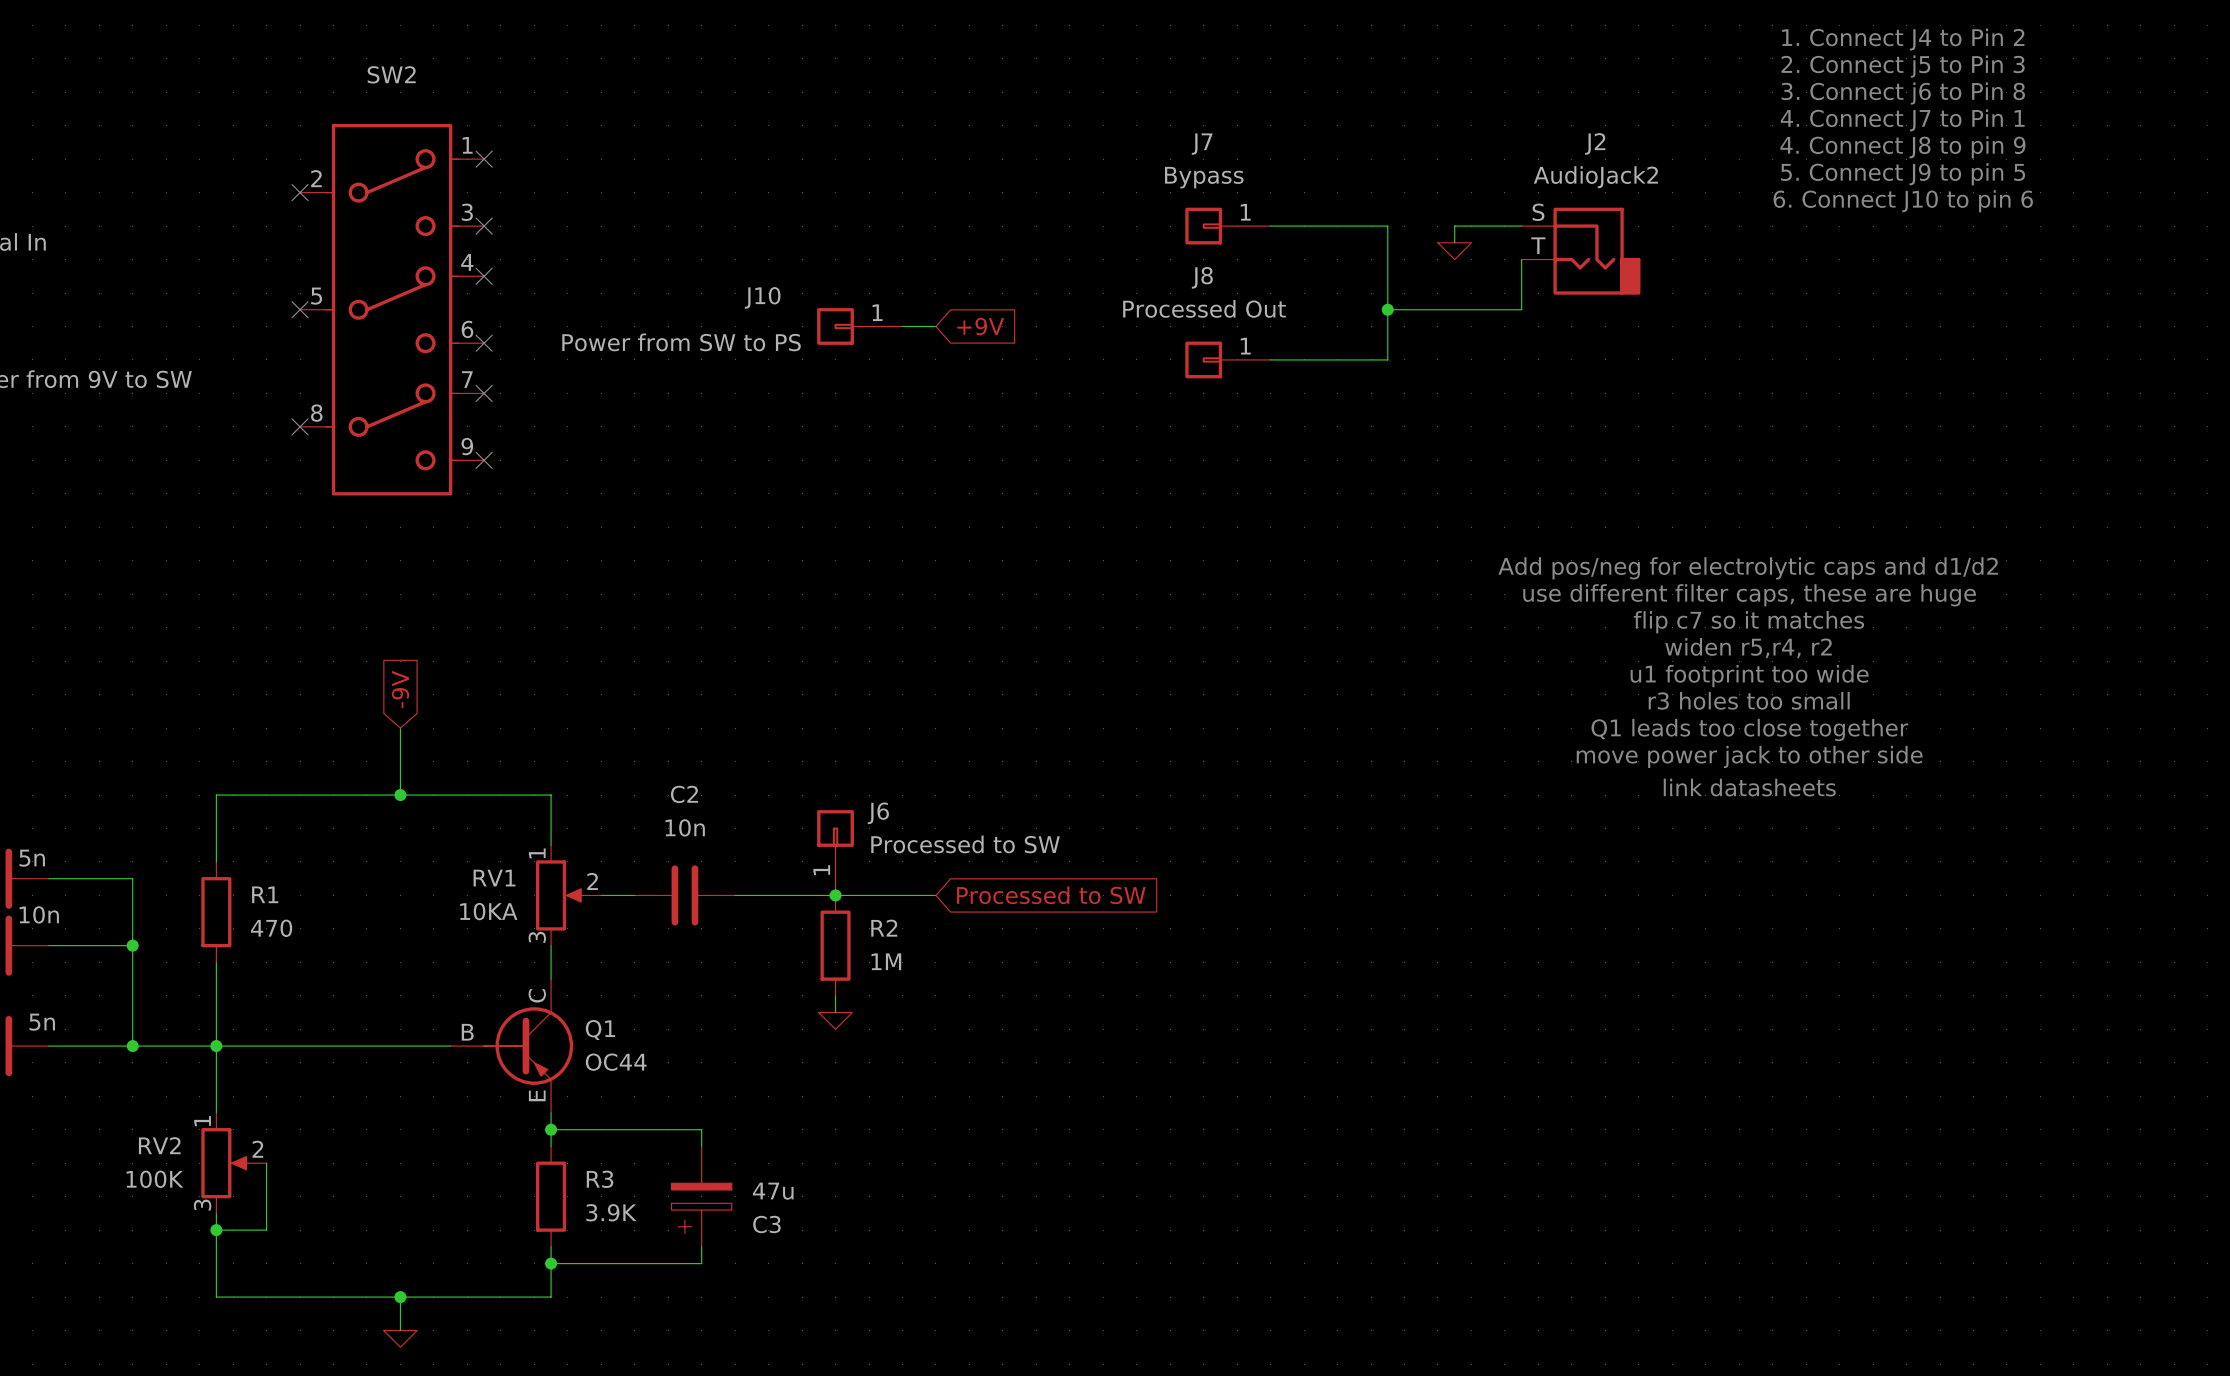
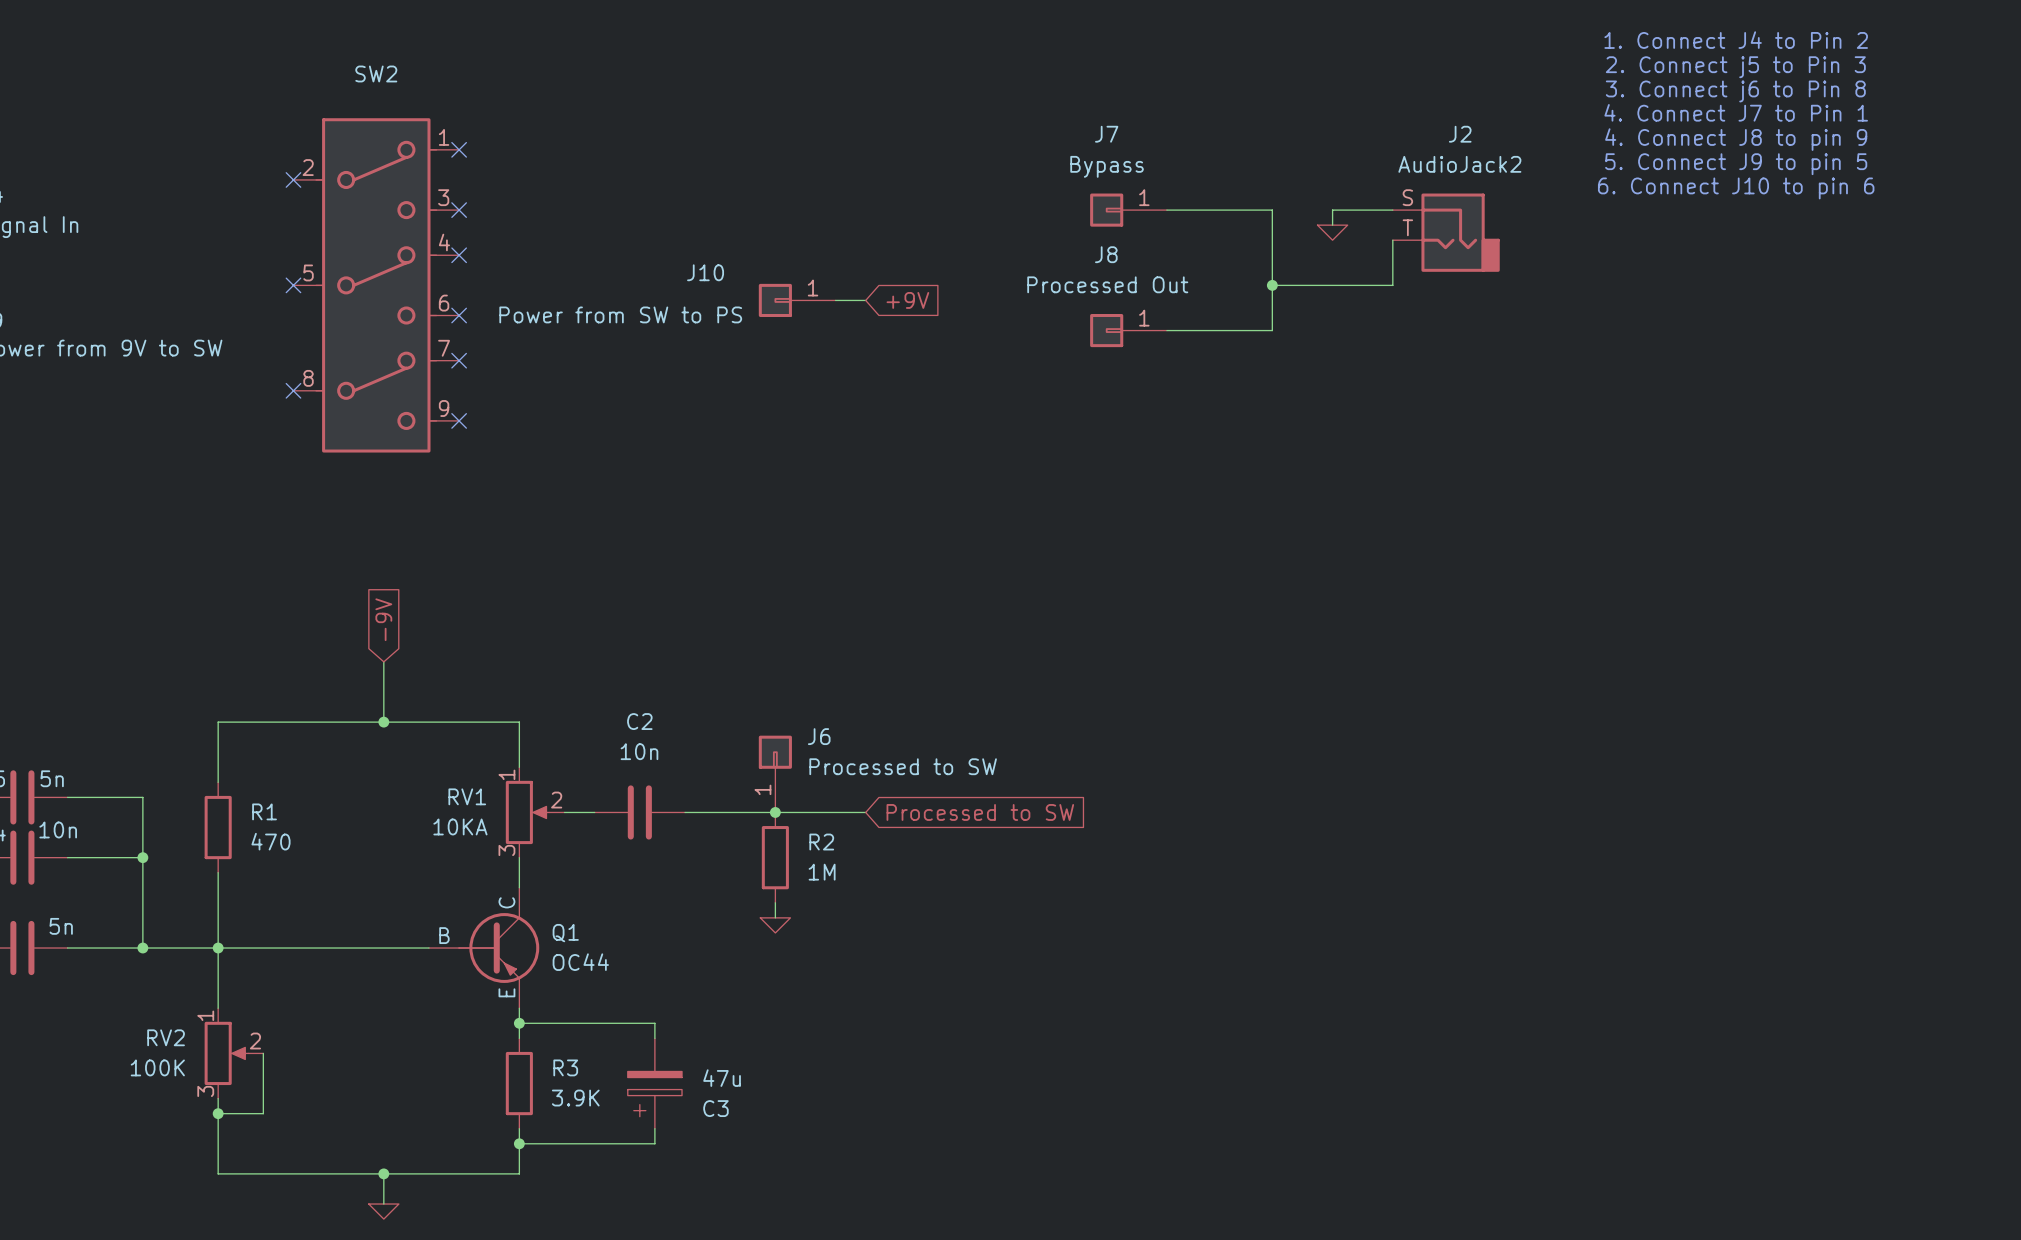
text: Add pos/neg for electrolytic caps and d1/d2 (1748, 568) -> none
text: use different filter caps, these are huge (1749, 595) -> none
text: flip c7 so it matches (1748, 622) -> none
text: widen r5,r4, r2 (1748, 648) -> none
text: u1 footprint too wide (1749, 676) -> none
text: r3 holes too small (1749, 700) -> none
text: Q1 leads too close together (1749, 729) -> none
text: move power jack to other side (1749, 756) -> none
text: link datasheets (1749, 787) -> none

